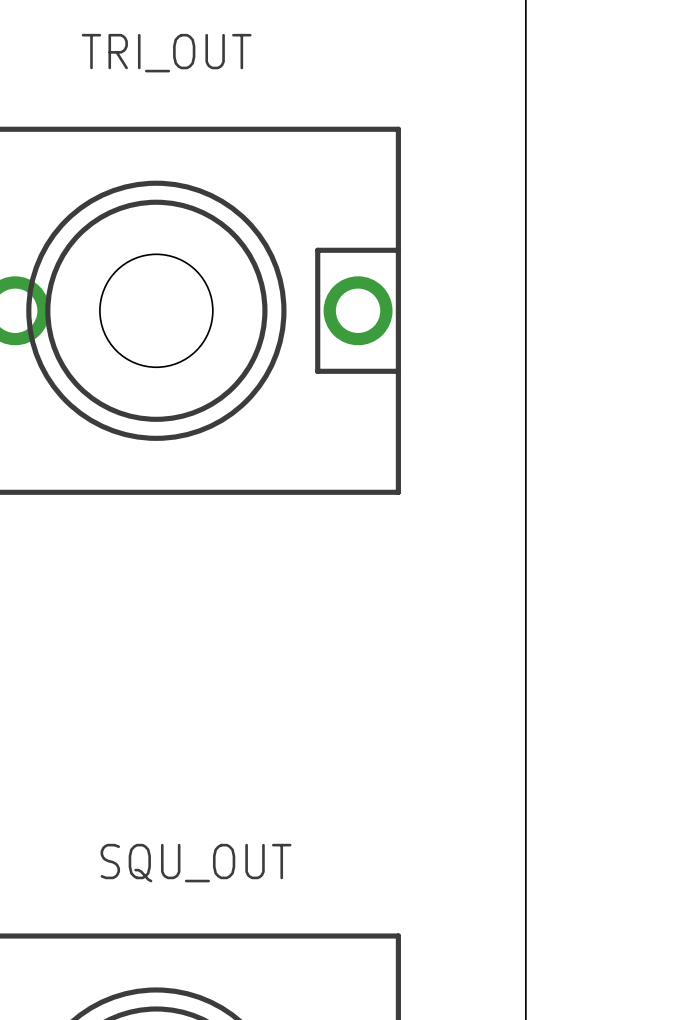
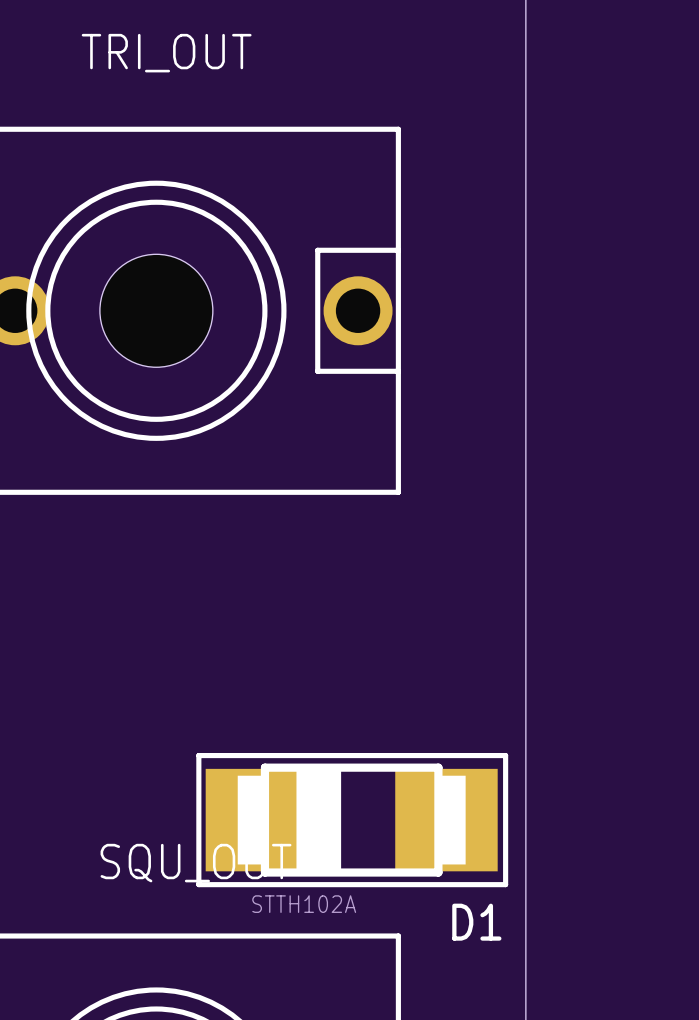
D1: none -> STTH102A (352, 820)

